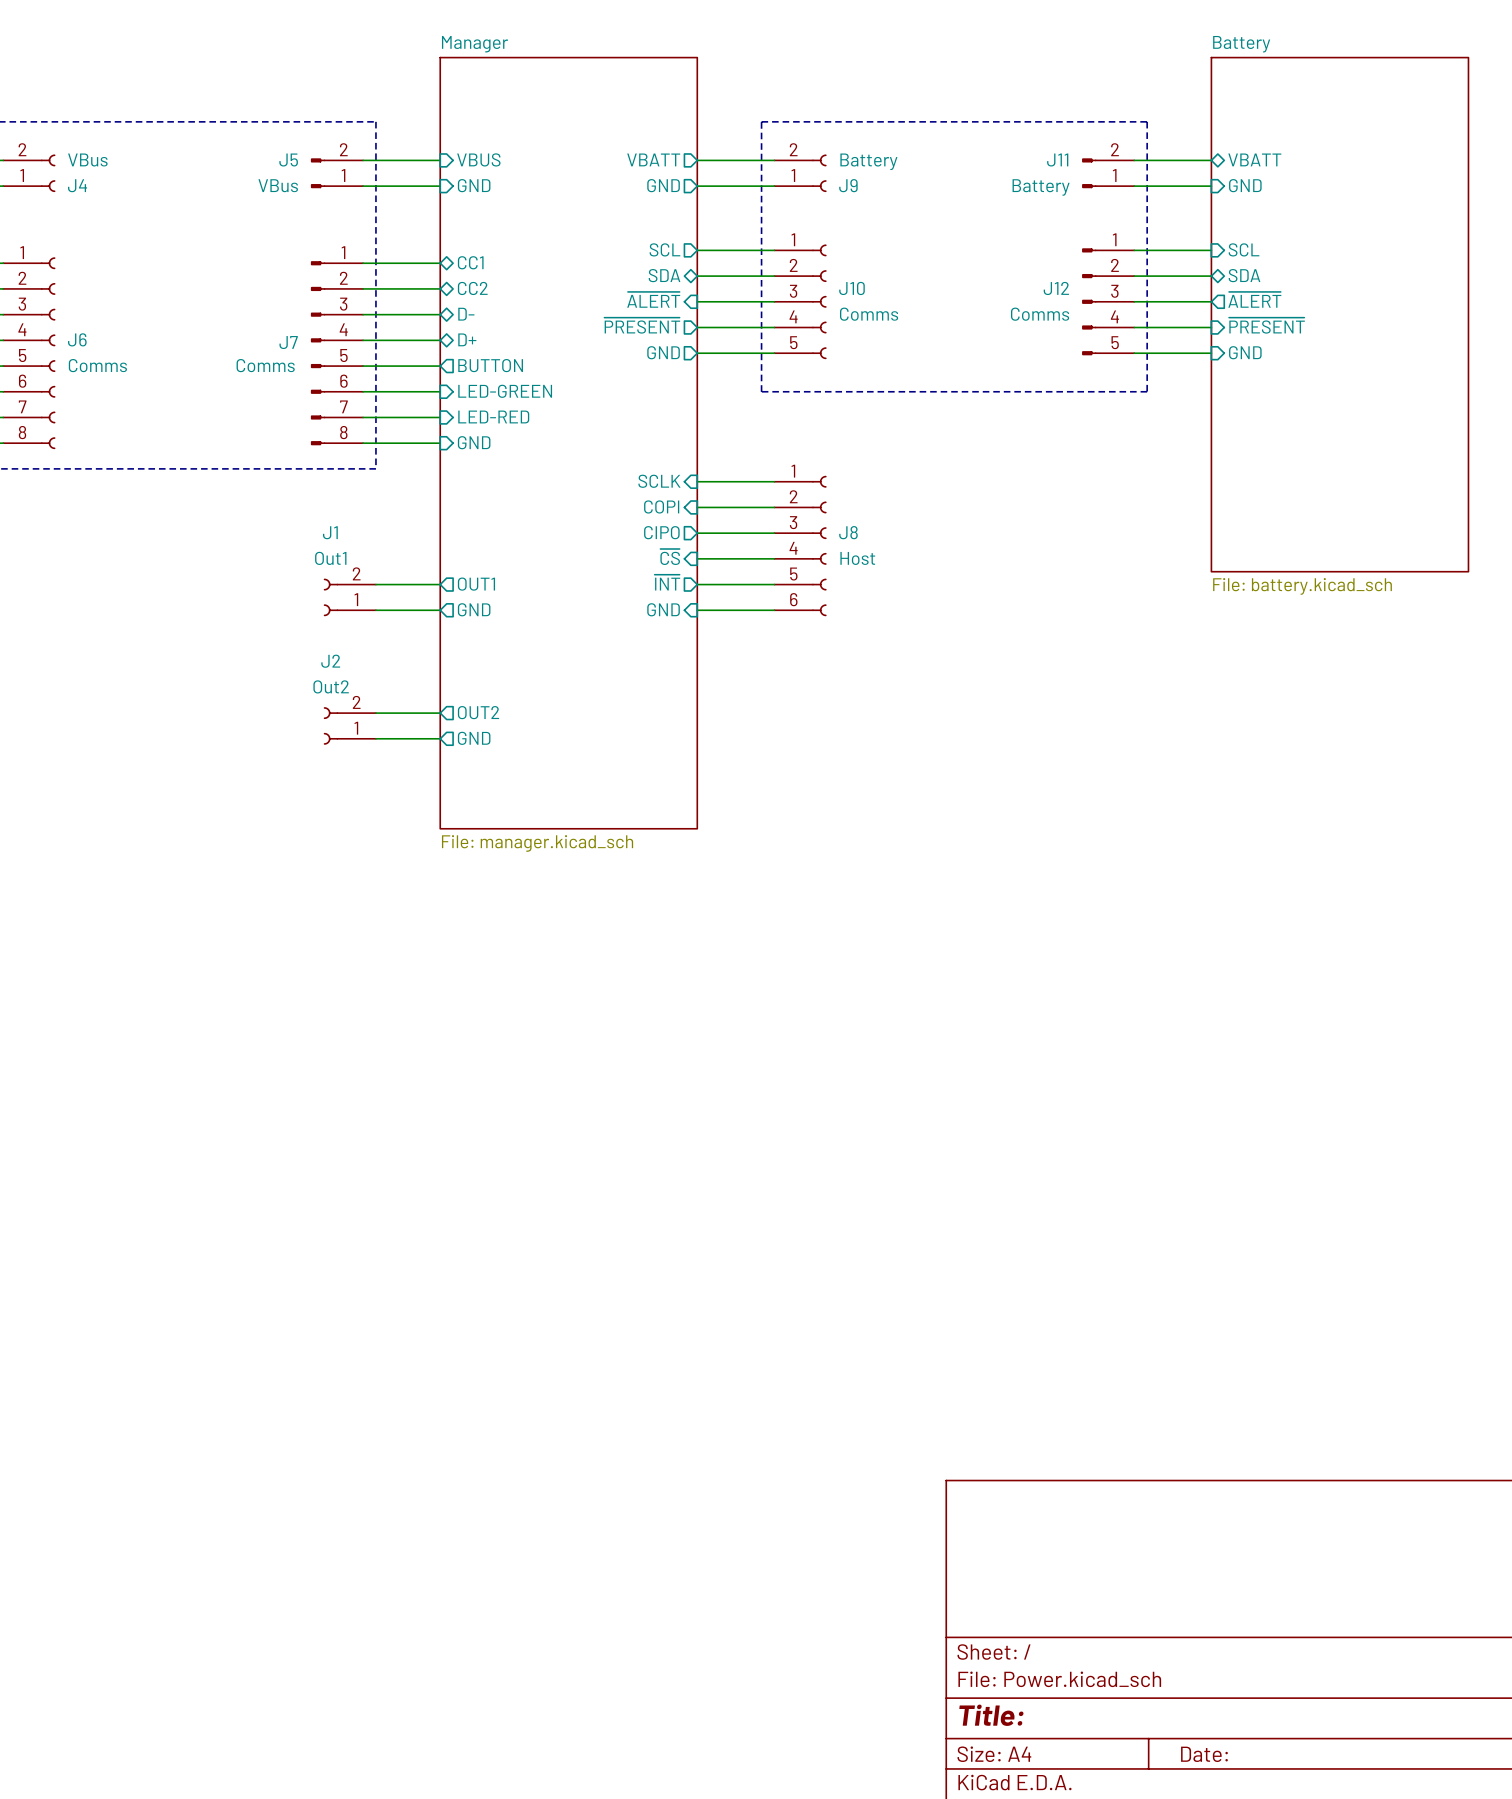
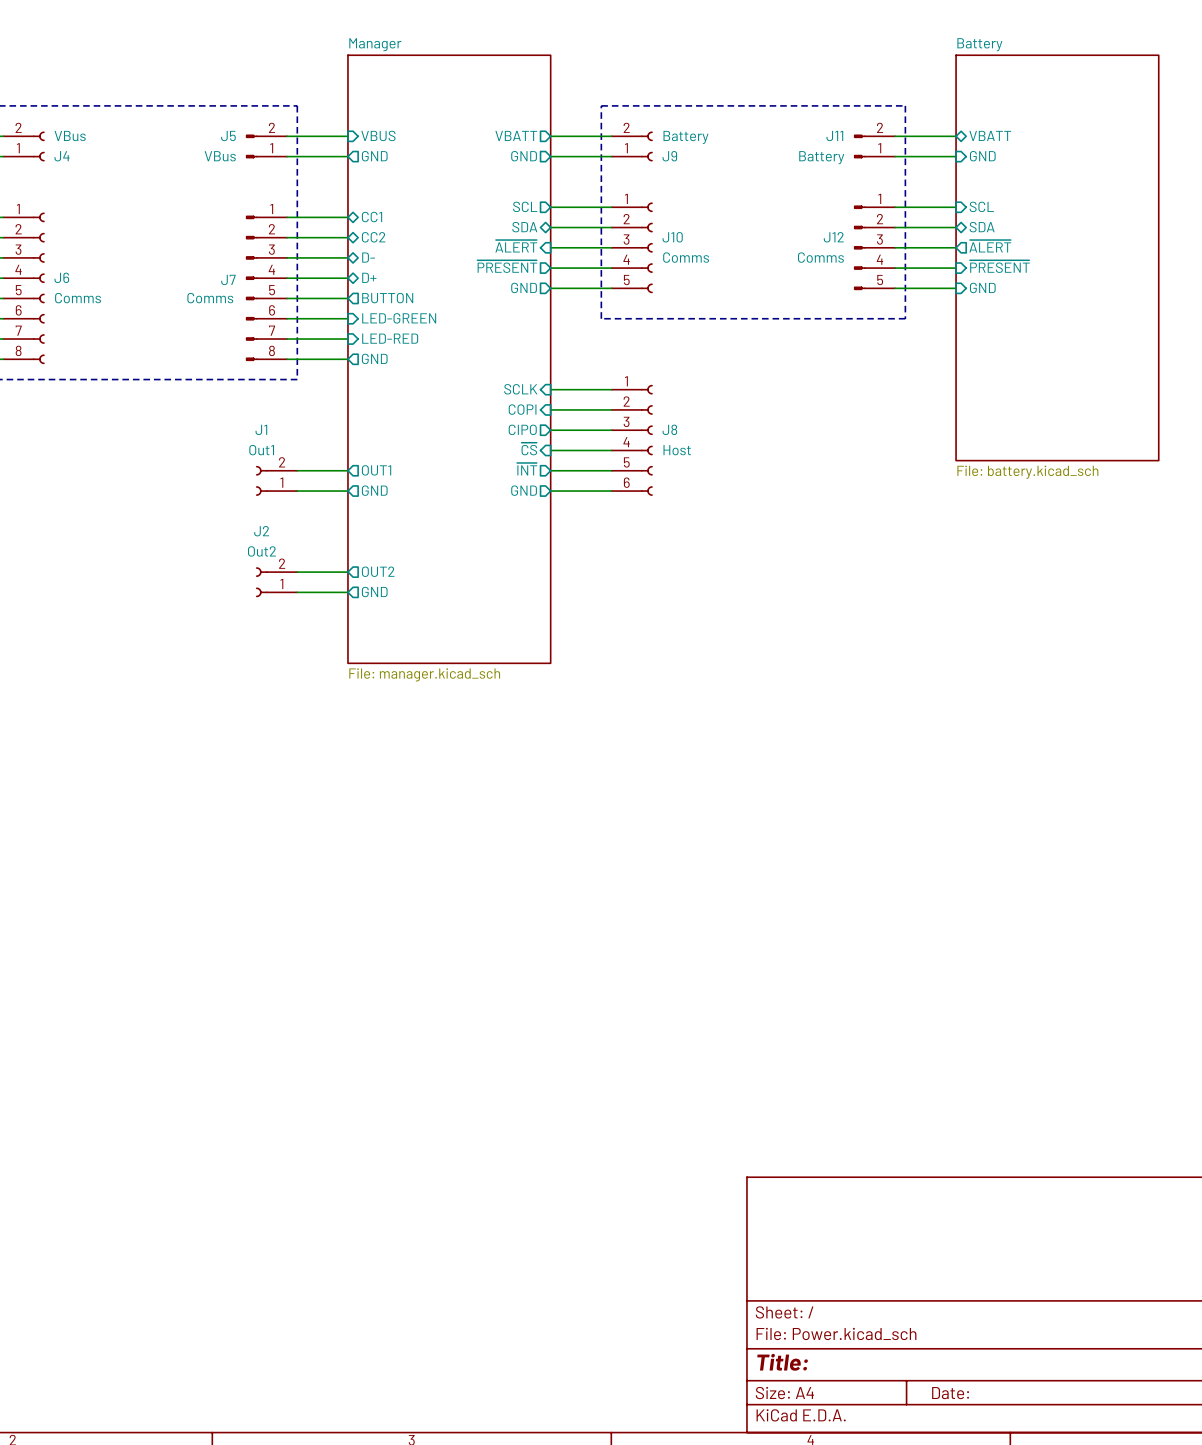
sheet pin shape: input (474, 185) -> output (374, 156)
sheet pin shape: input (474, 442) -> output (374, 358)
sheet pin shape: input (663, 609) -> output (524, 490)

